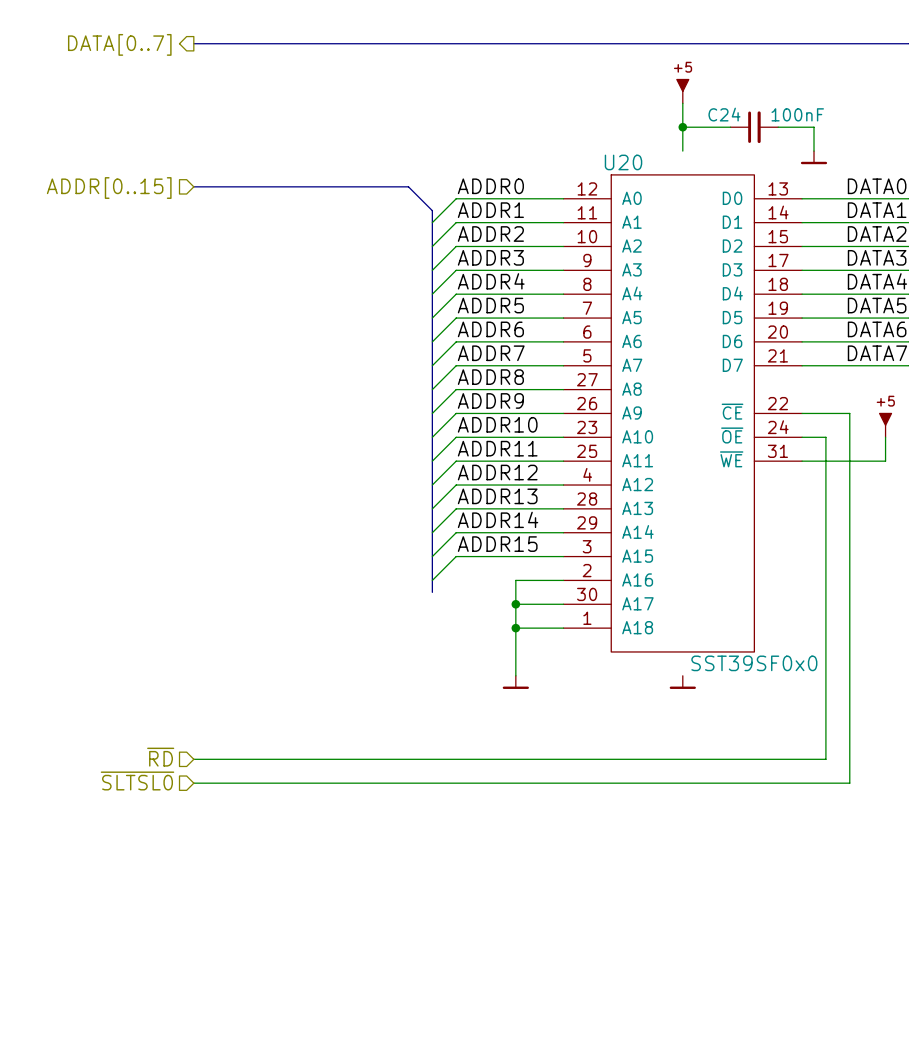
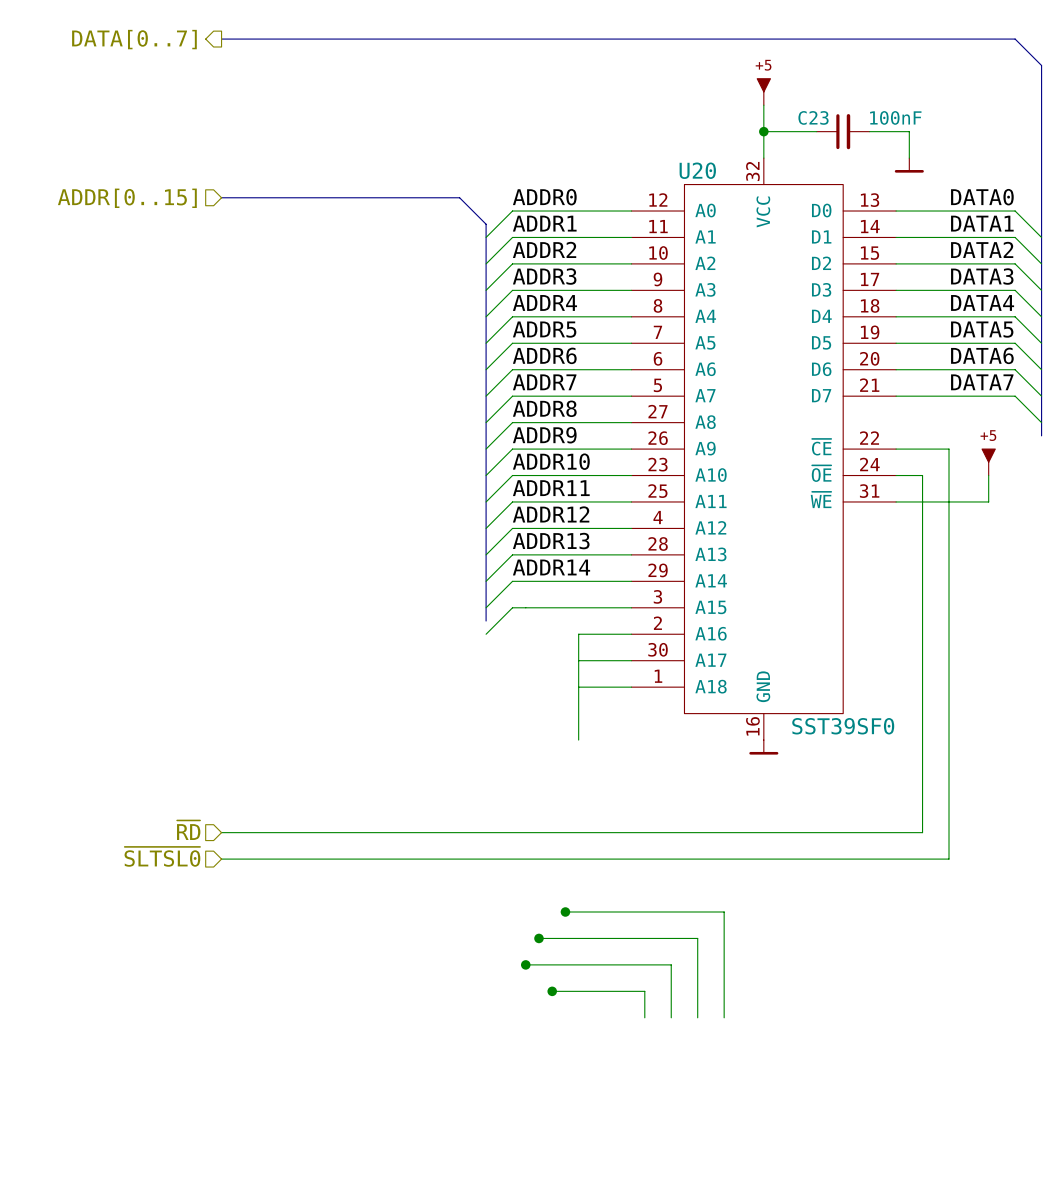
C24 name: C24 (724, 114) -> C23 (813, 117)
U20 symbol: [563, 174, 803, 652] -> [631, 158, 897, 741]
label: ADDR15 (497, 544) -> none
bus: (432, 568) (432, 592) -> none
junction: (515, 604) -> none
junction: (515, 628) -> none
U20 value: SST39SF0x0 (754, 663) -> SST39SF0 (843, 726)
power symbol: (515, 682) -> none
wire: none -> (565, 911) (724, 911) (724, 1017)
junction: none -> (565, 911)
wire: none -> (538, 938) (697, 938) (697, 1017)
junction: none -> (538, 938)
wire: none -> (525, 964) (671, 964) (671, 1017)
junction: none -> (525, 964)
wire: none -> (552, 991) (644, 991) (644, 1017)
junction: none -> (552, 991)

